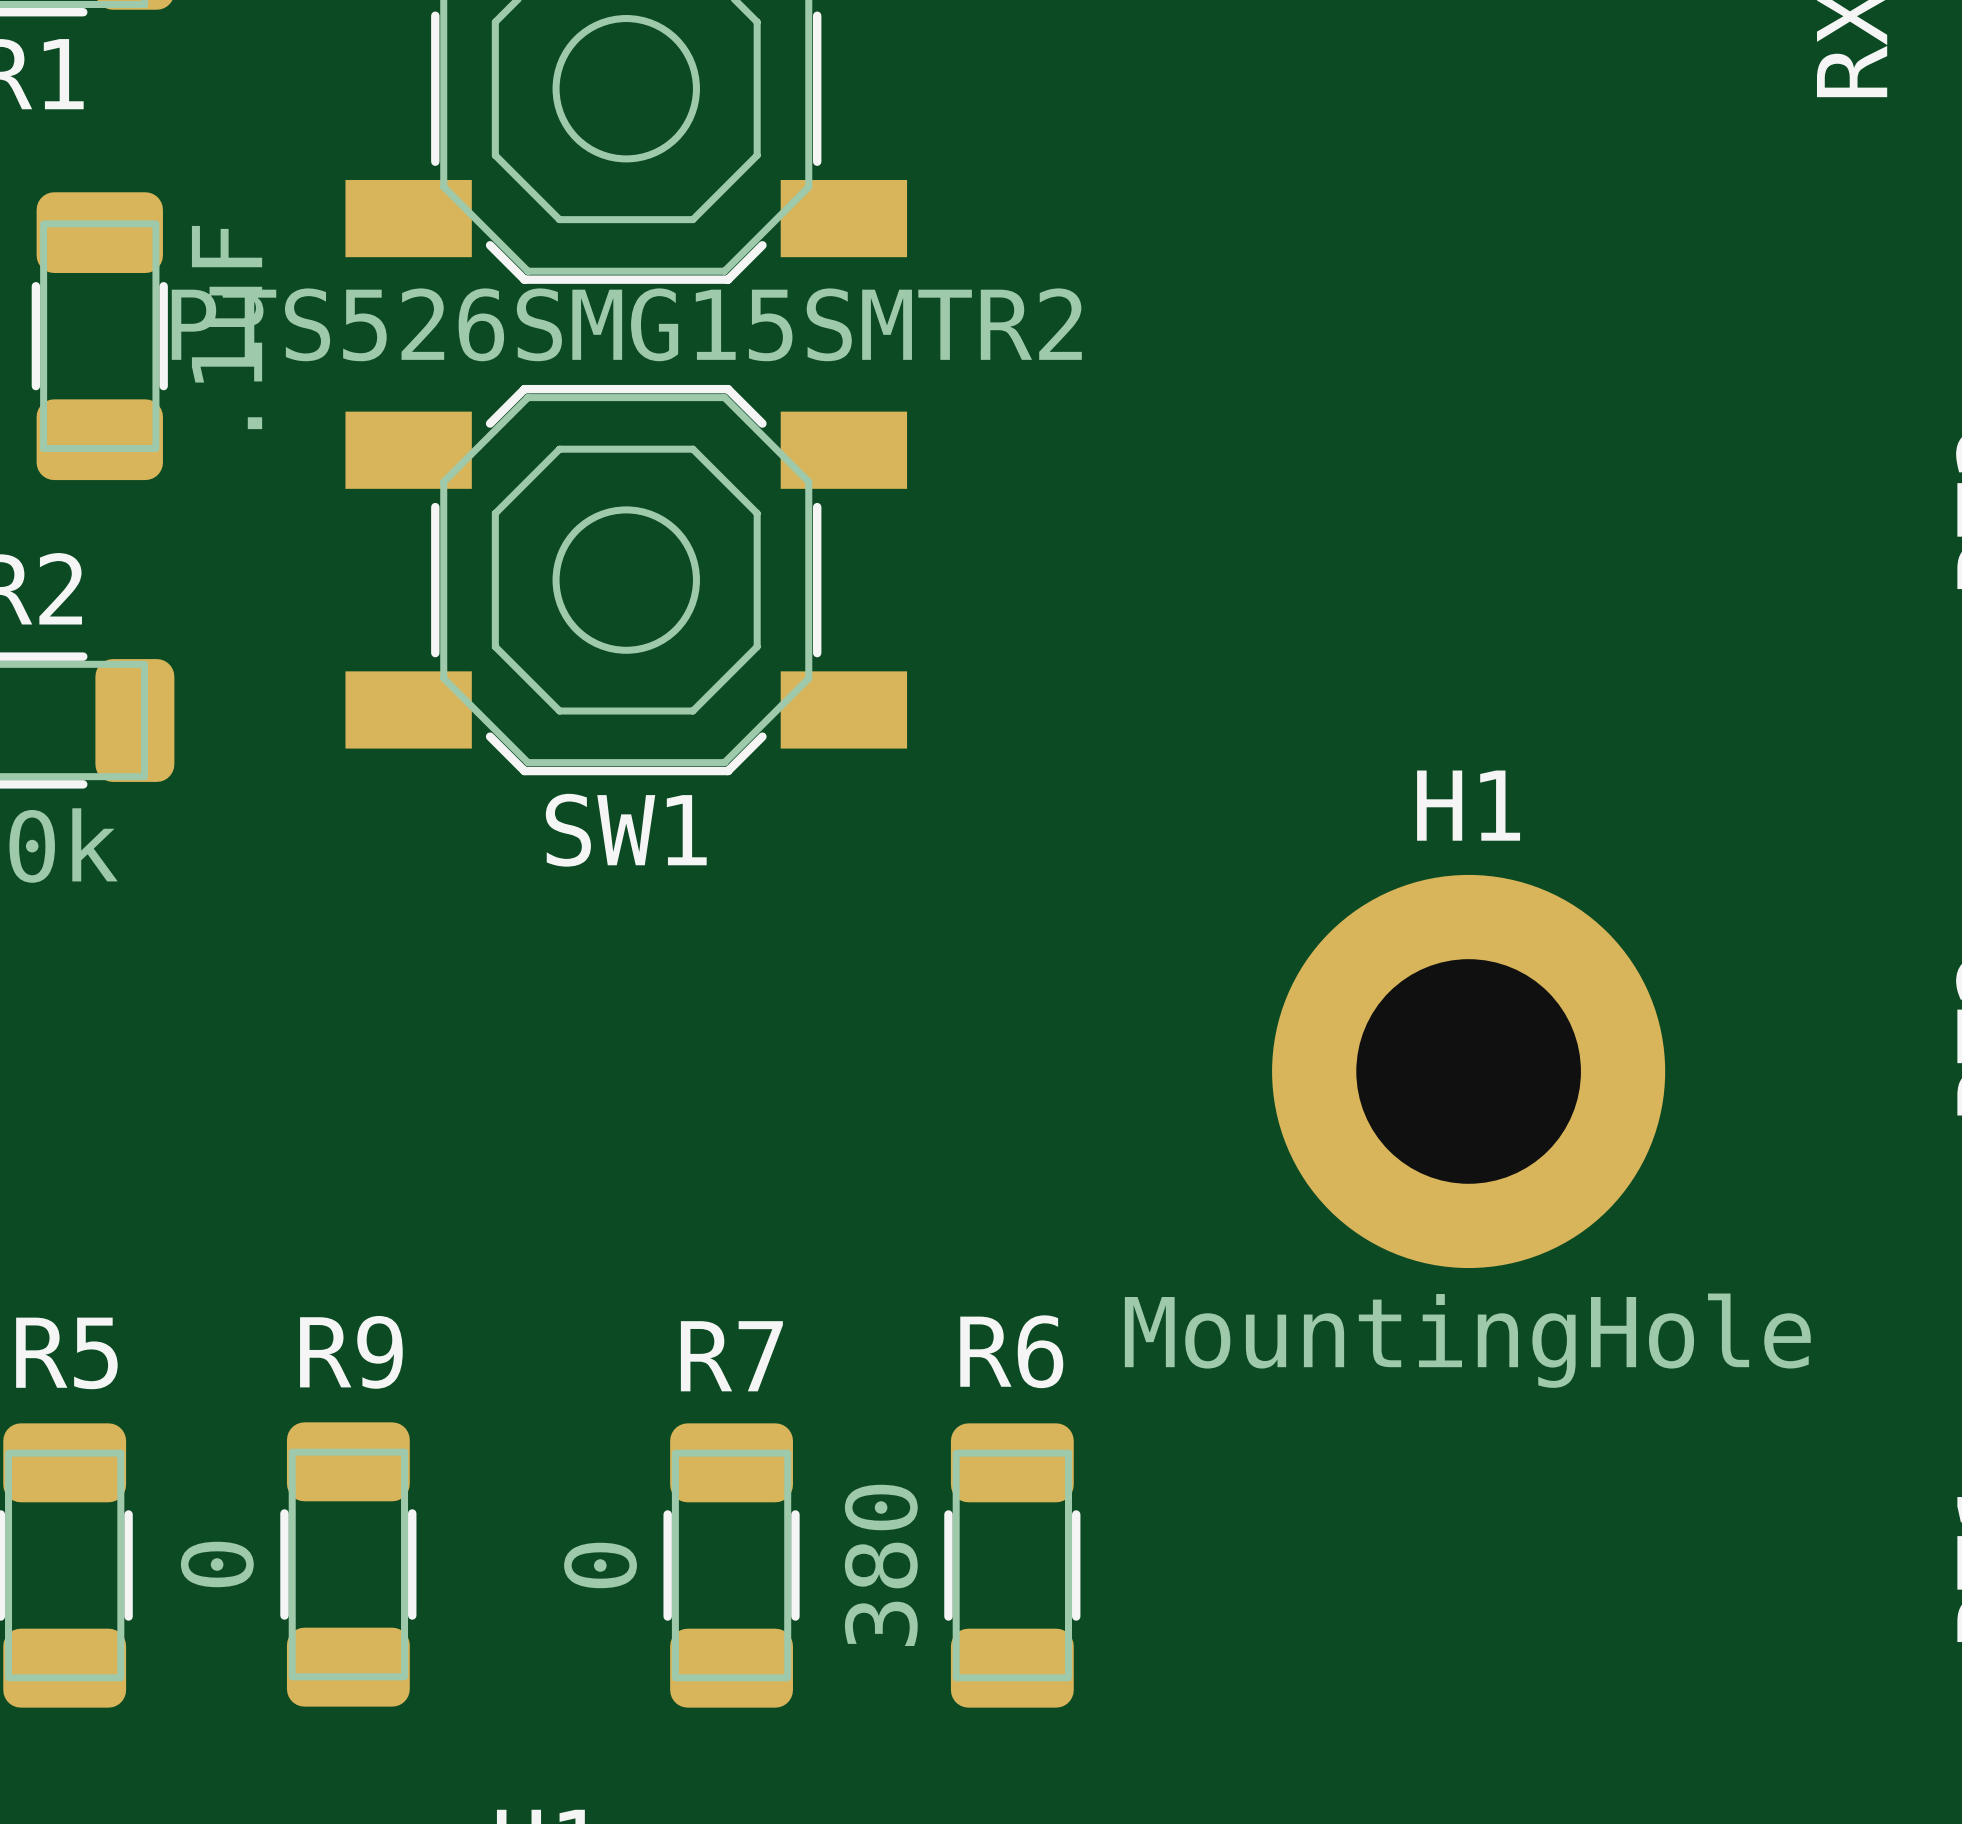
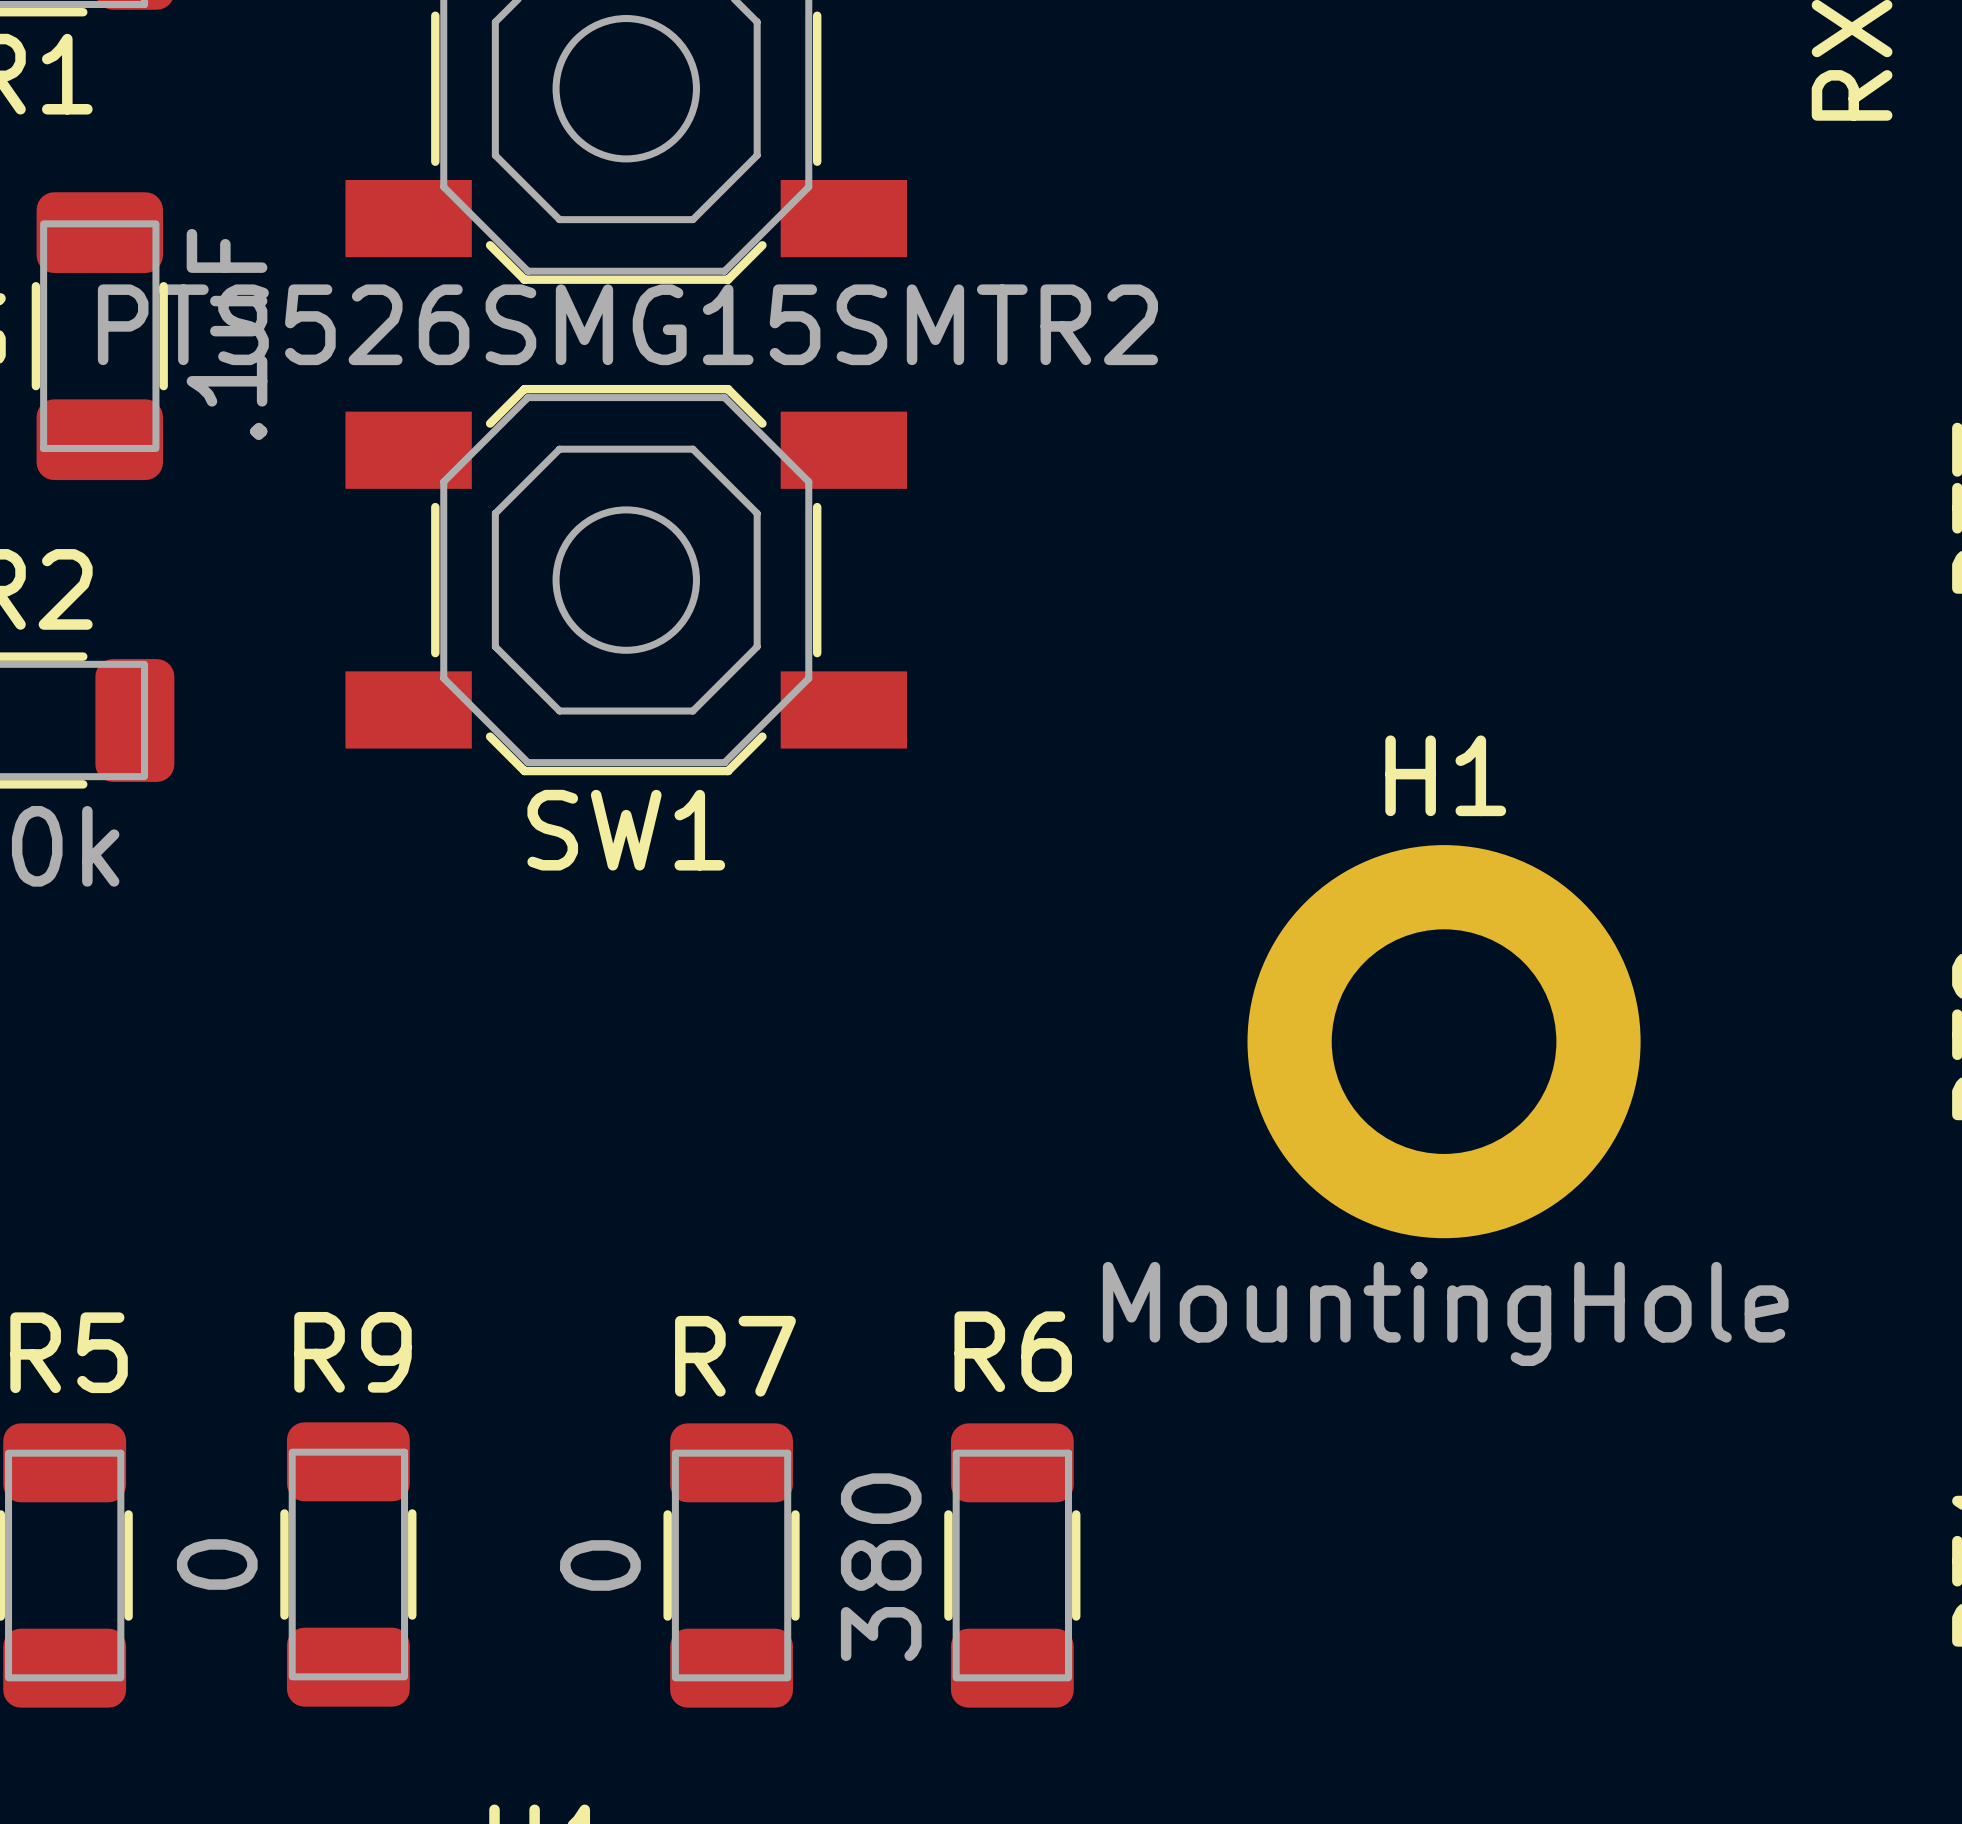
H1 position: (1468, 1071) -> (1444, 1041)

